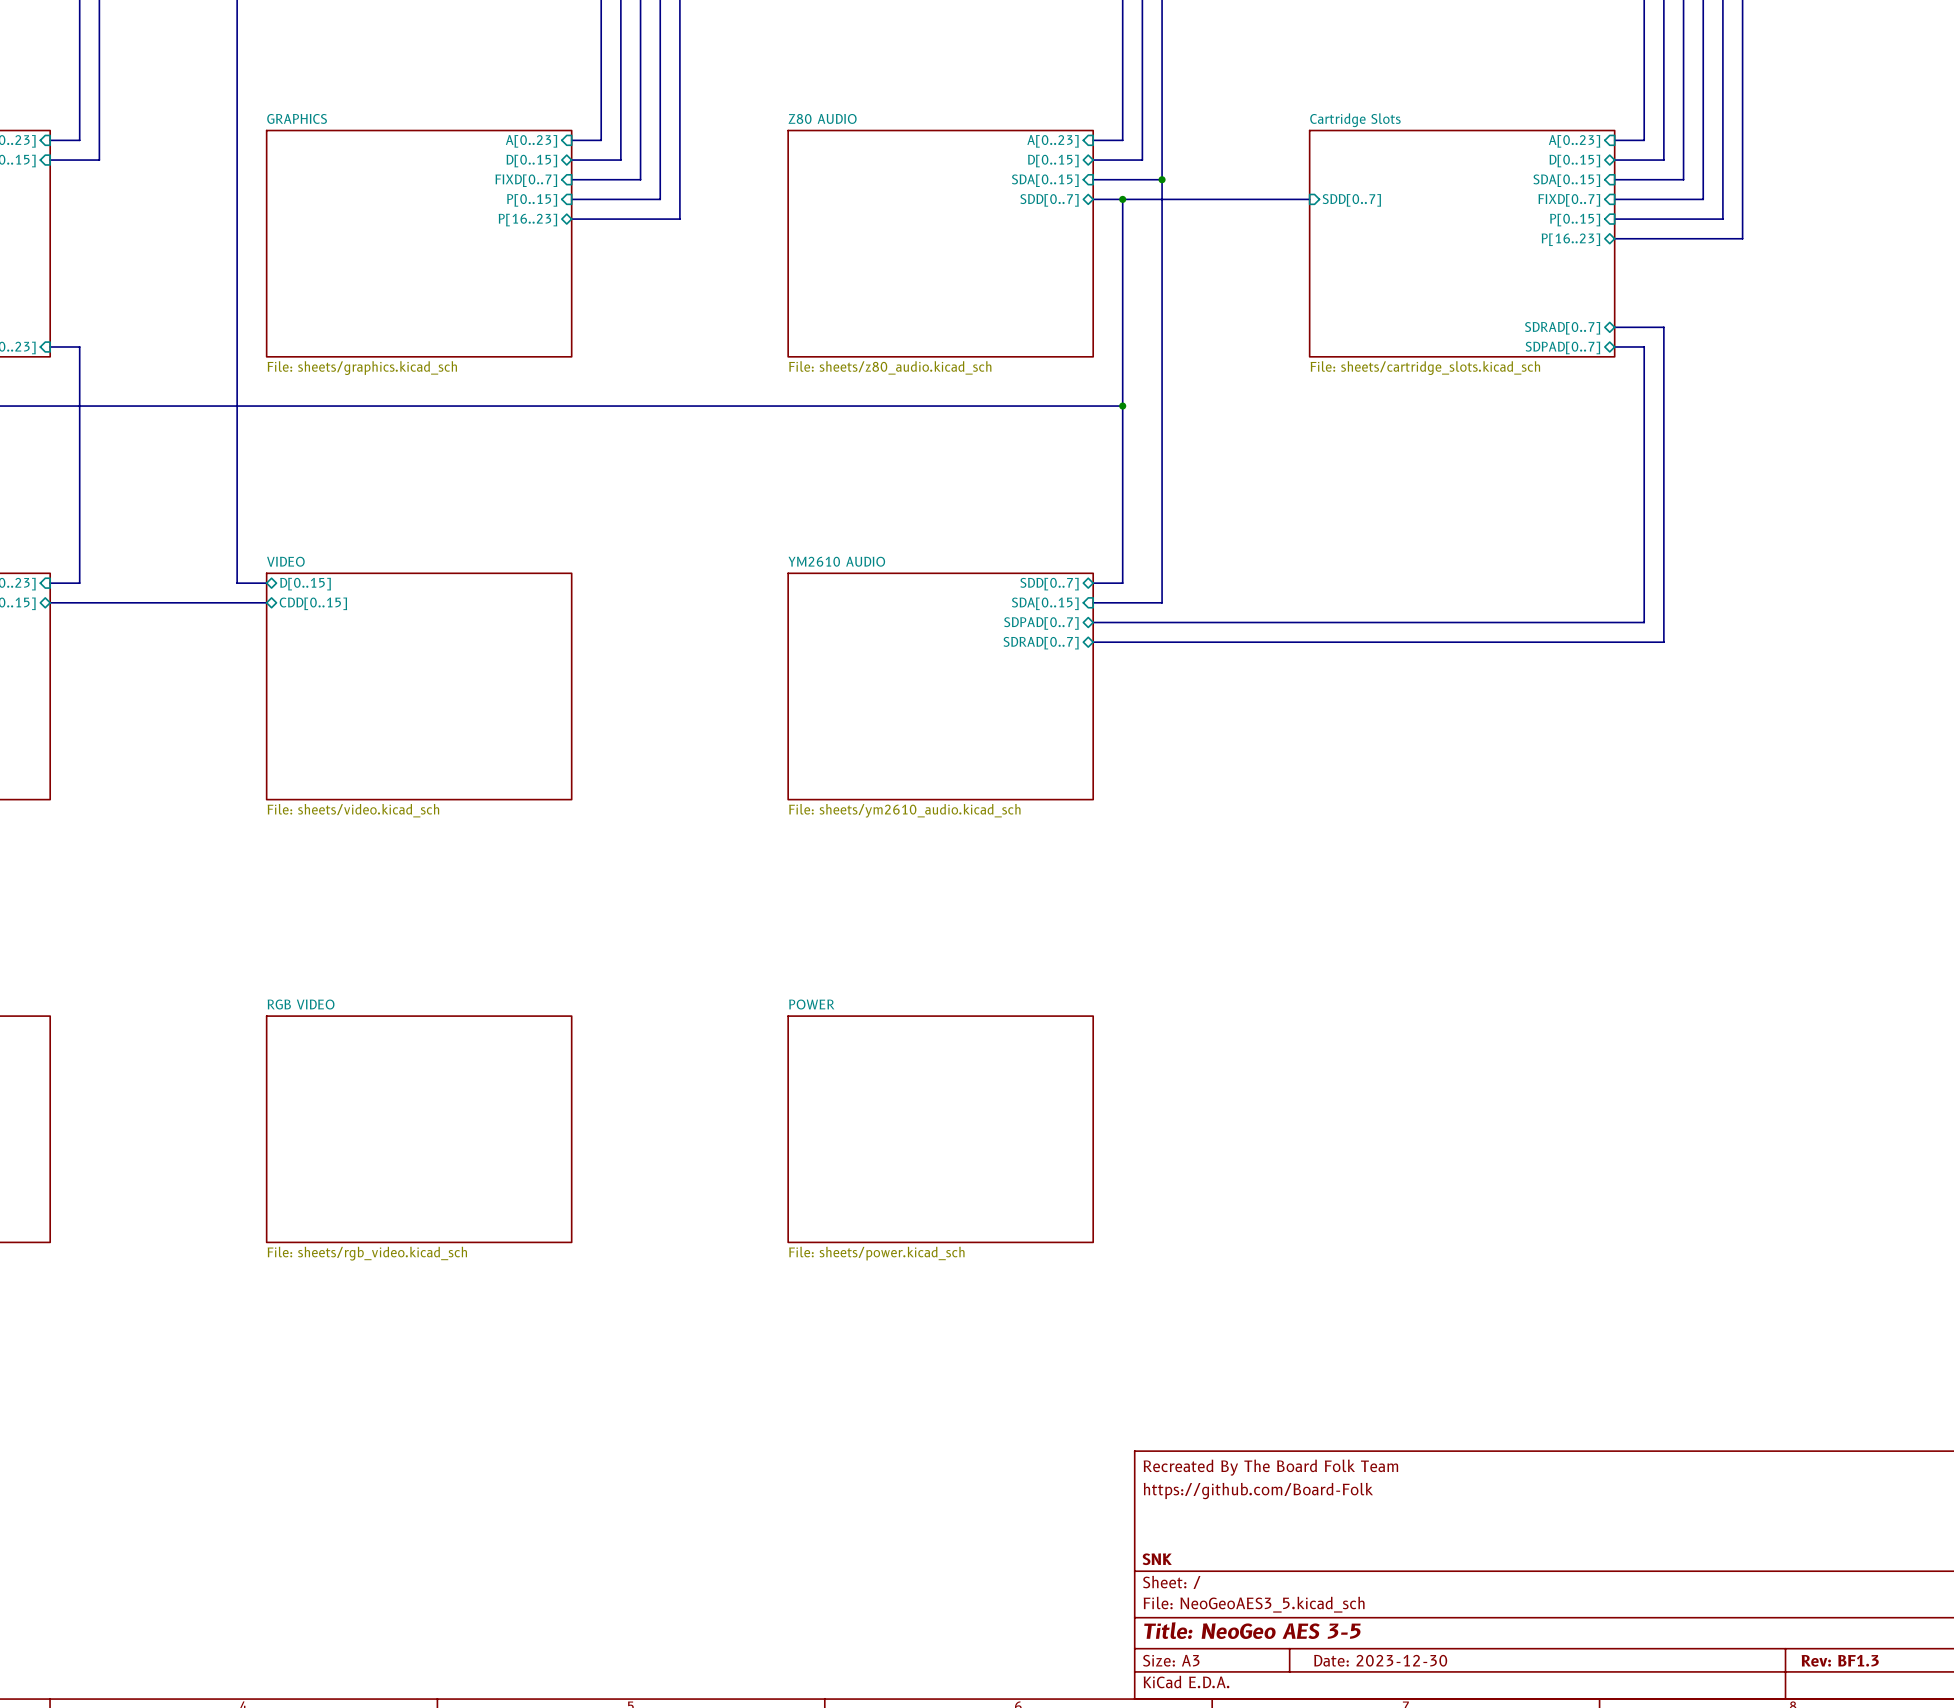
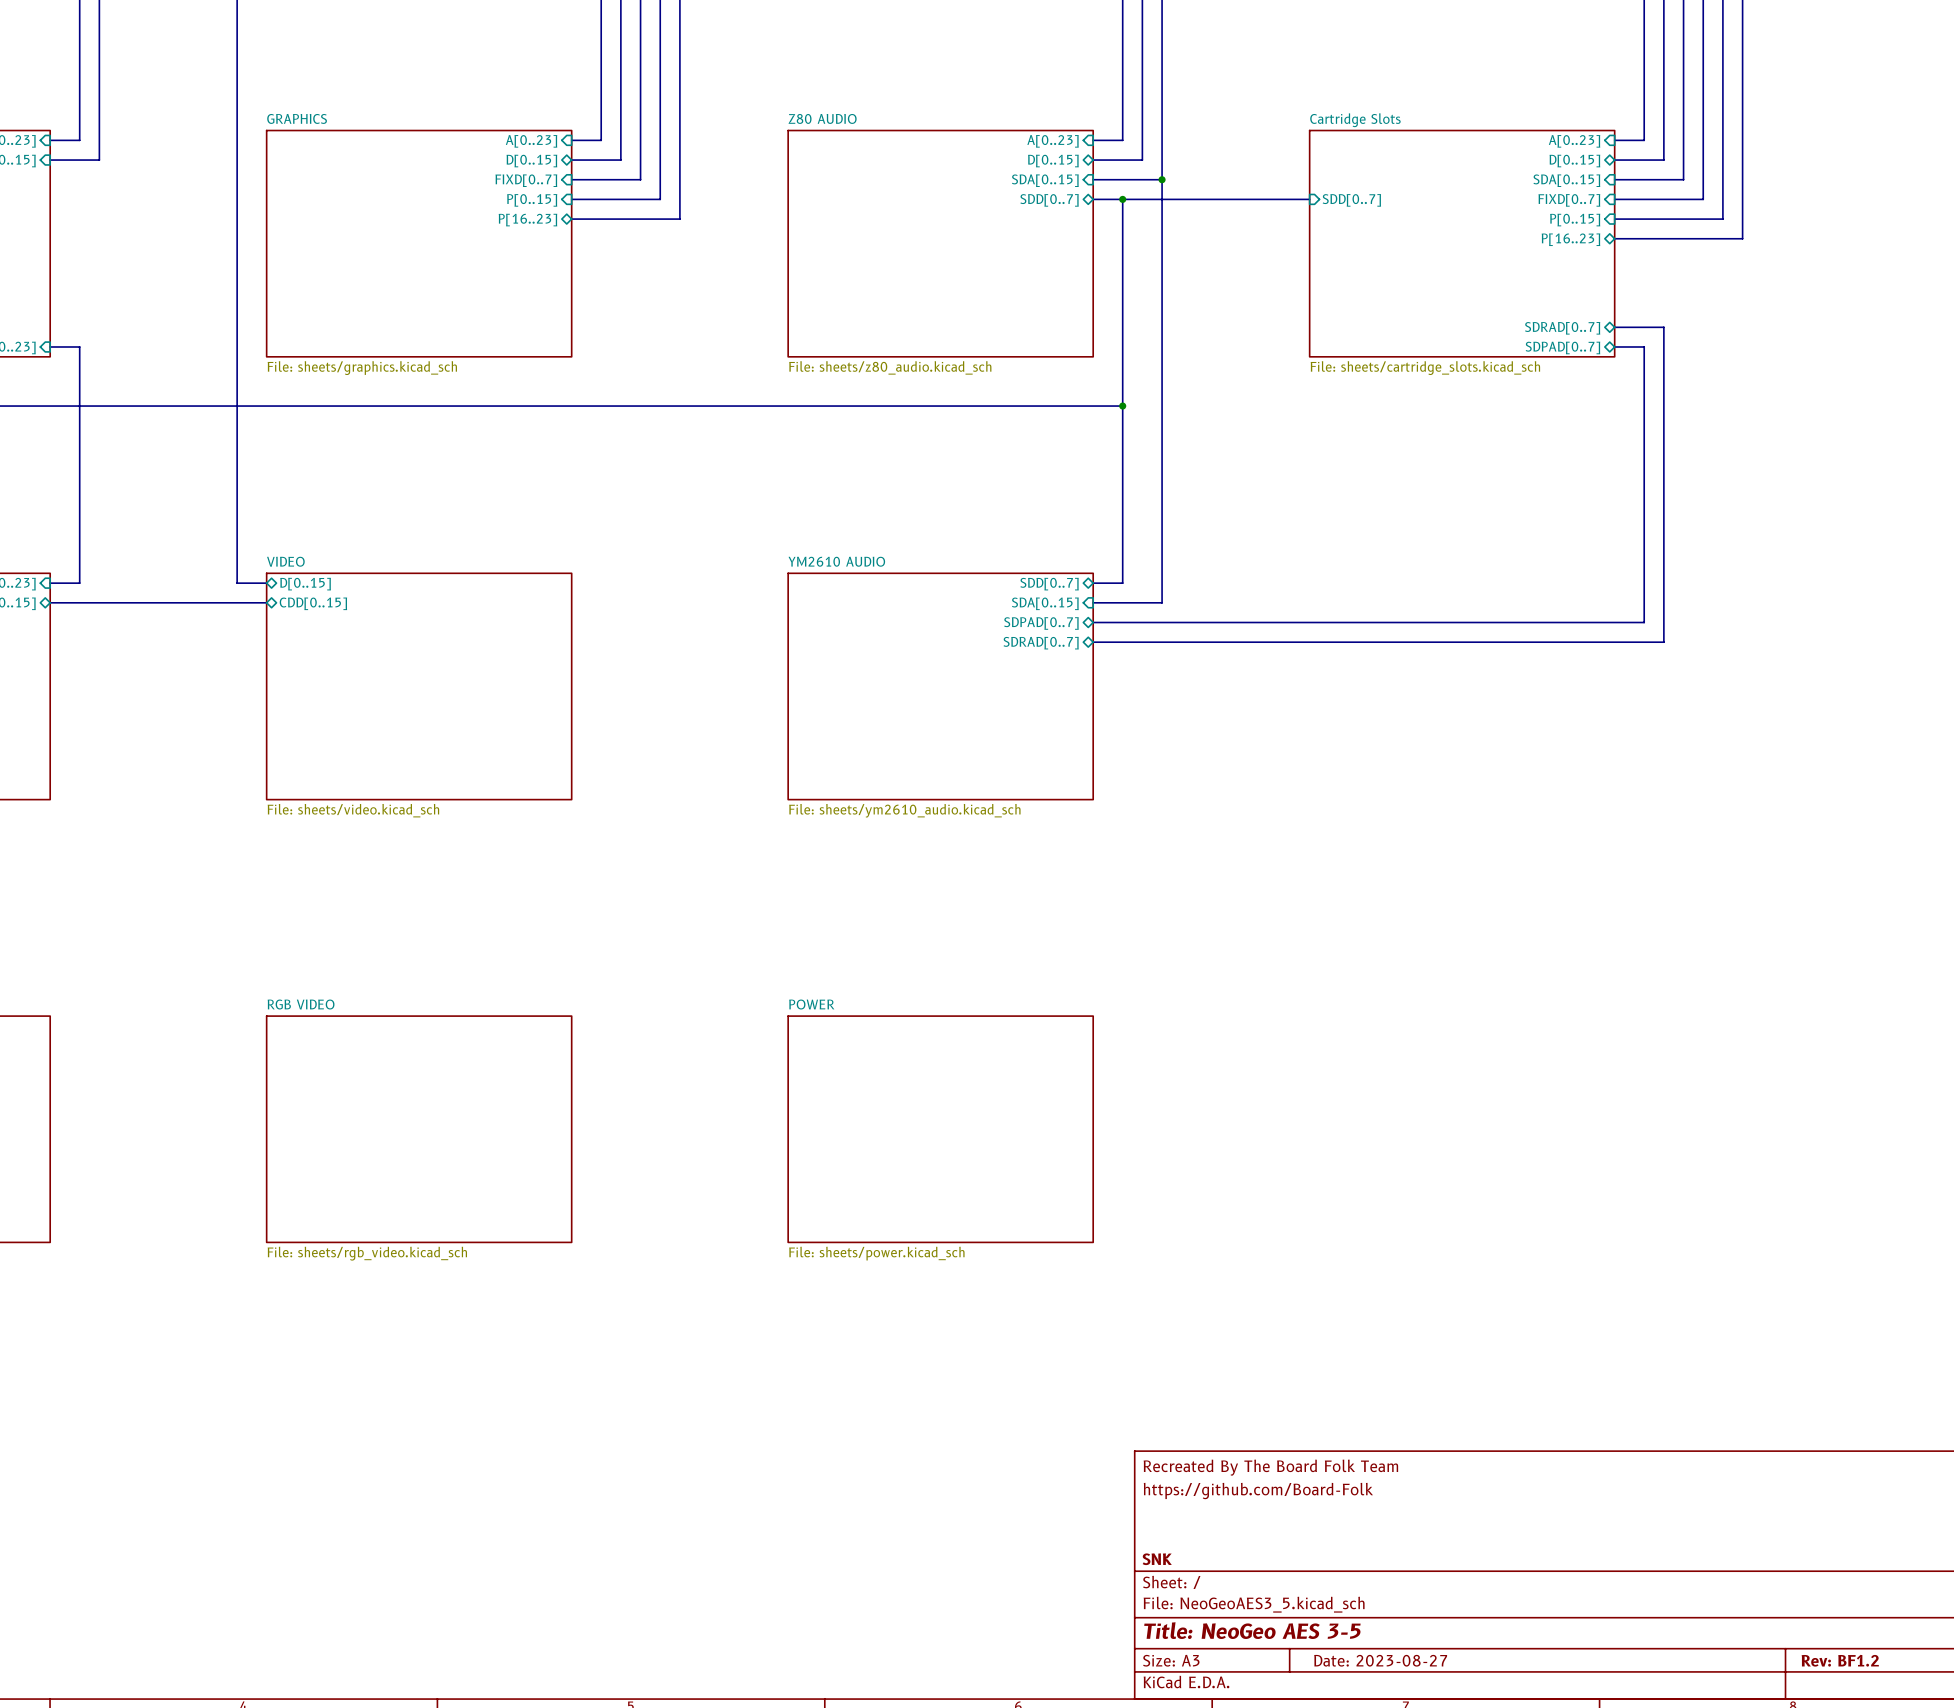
title block: Date: 2023-12-30 (1380, 1660) -> Date: 2023-08-27 (1380, 1660)
title block: Rev: BF1.3 (1840, 1660) -> Rev: BF1.2 (1840, 1660)

